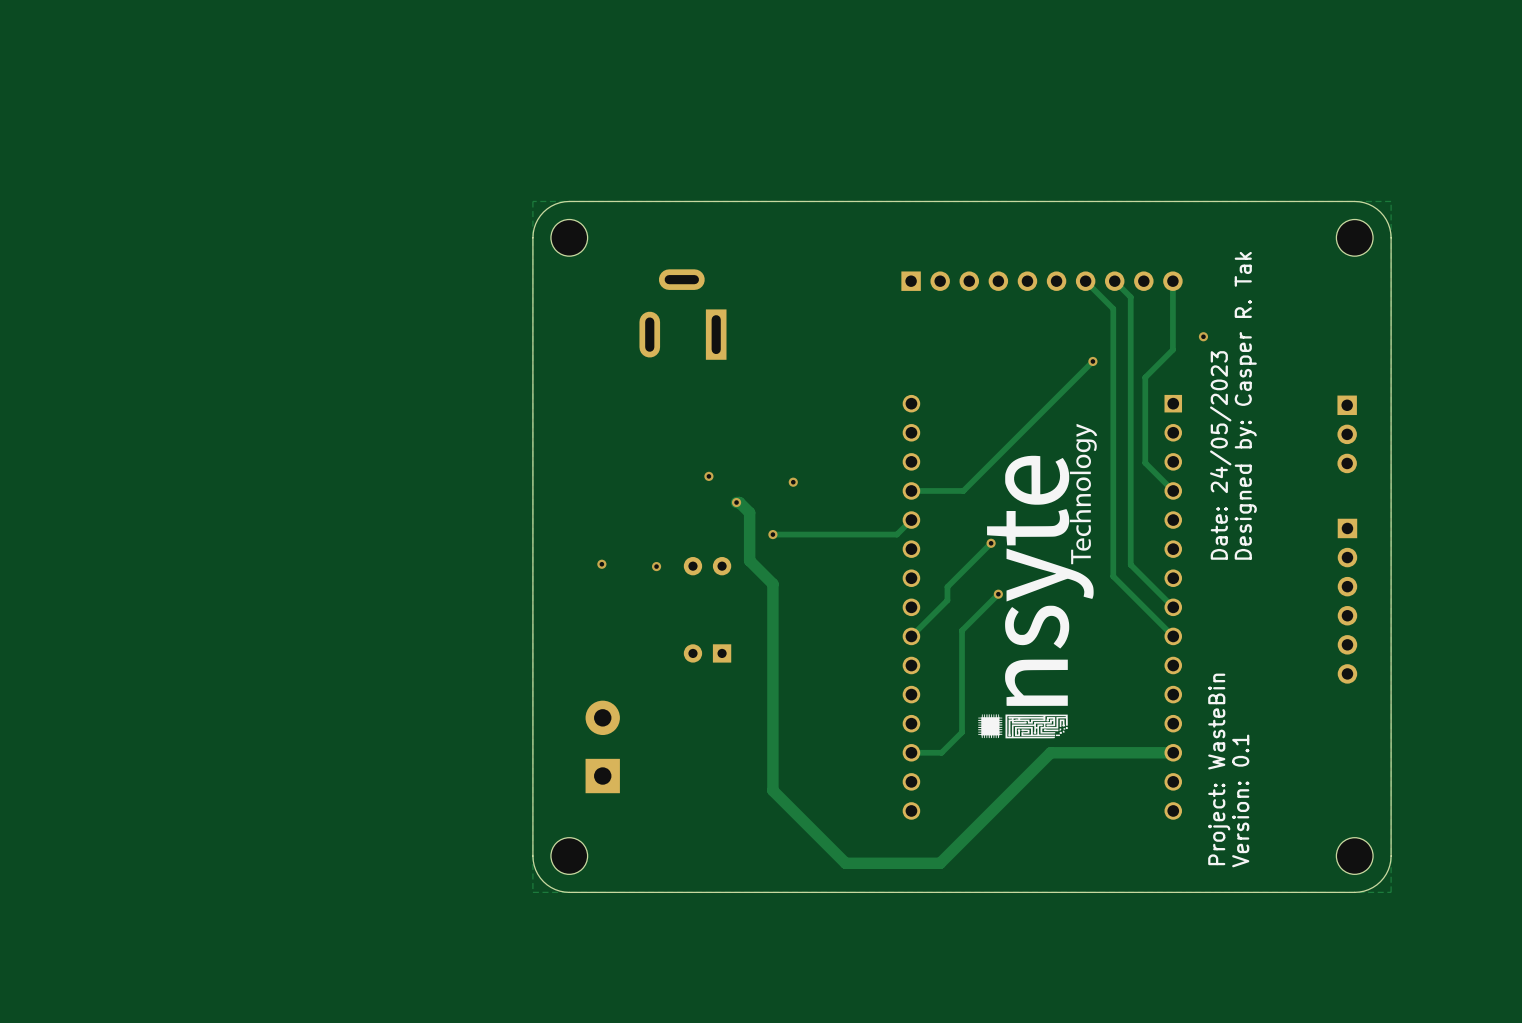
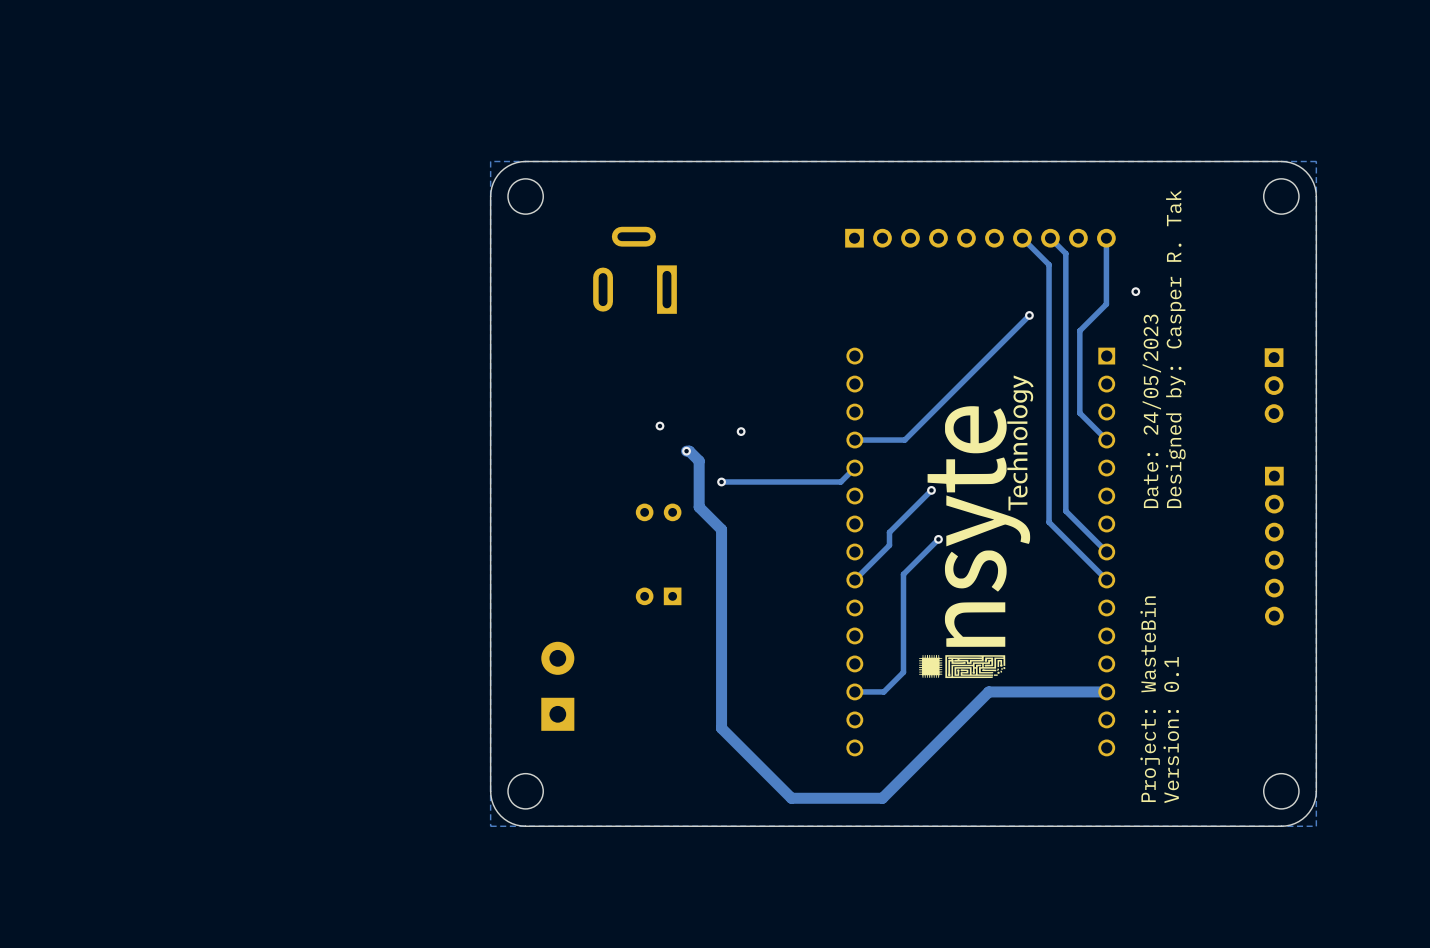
via: (601, 564) -> none
via: (656, 566) -> none

